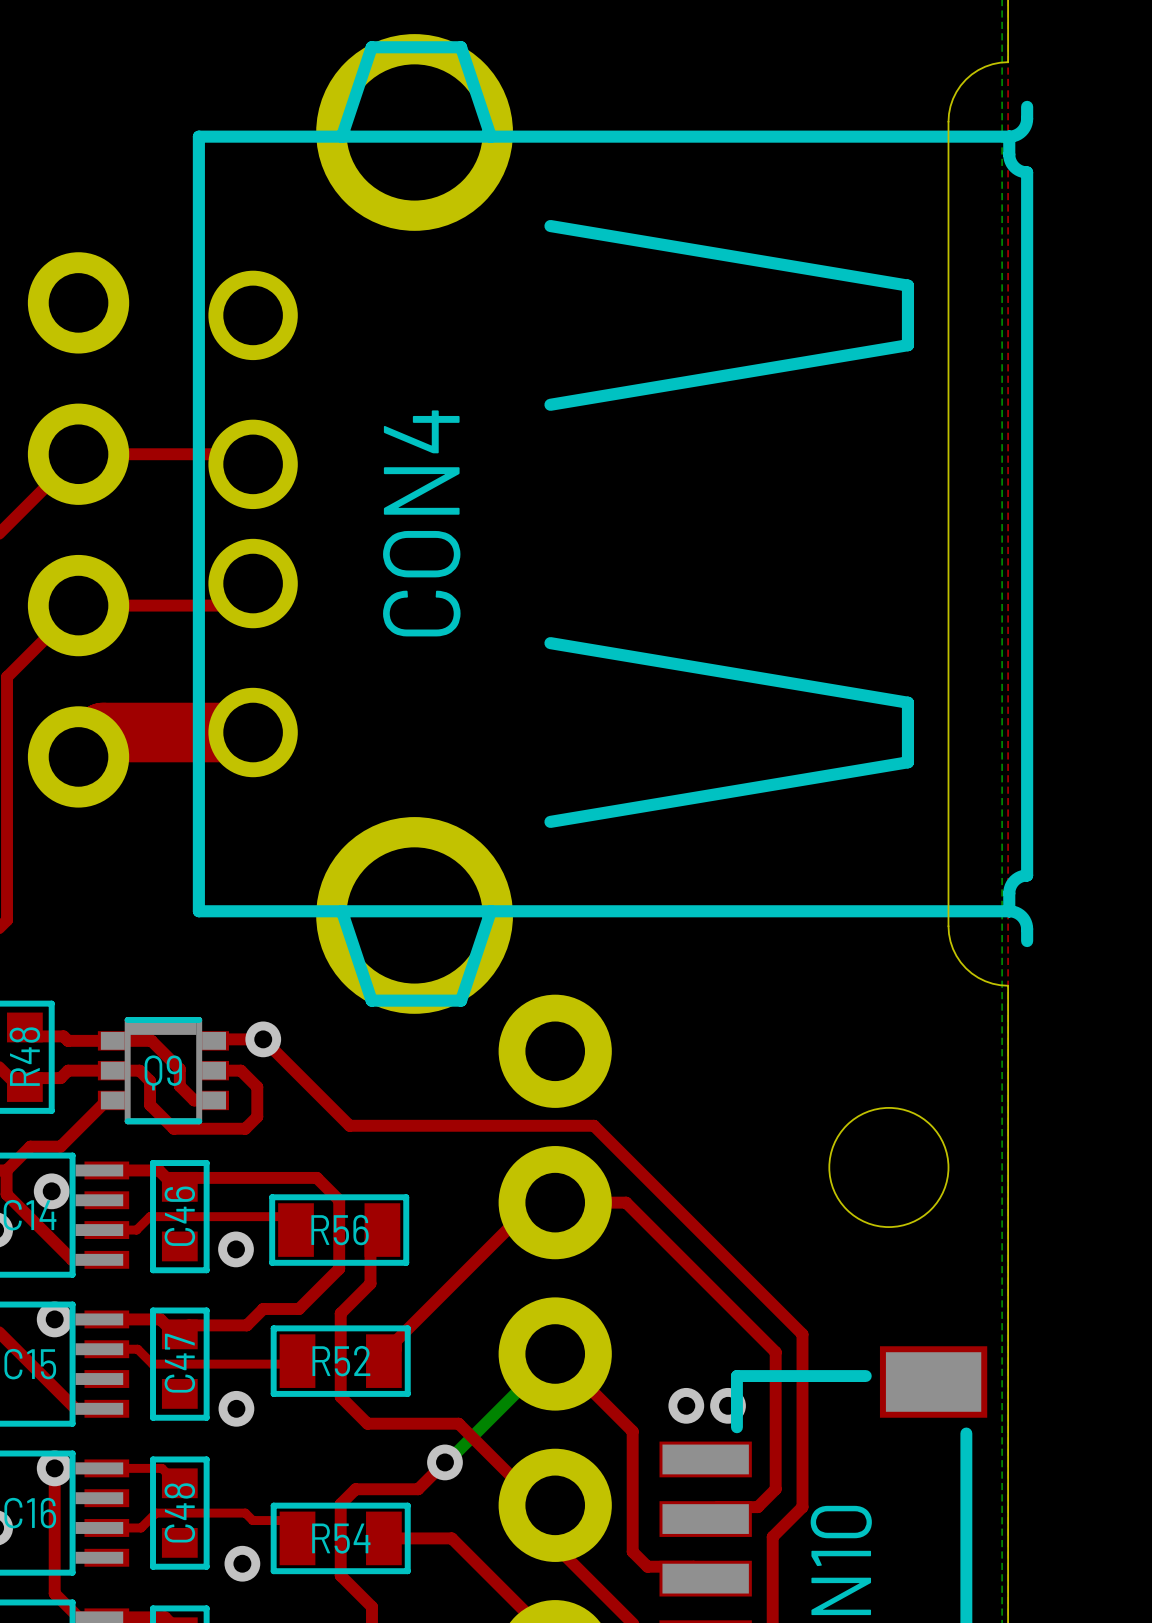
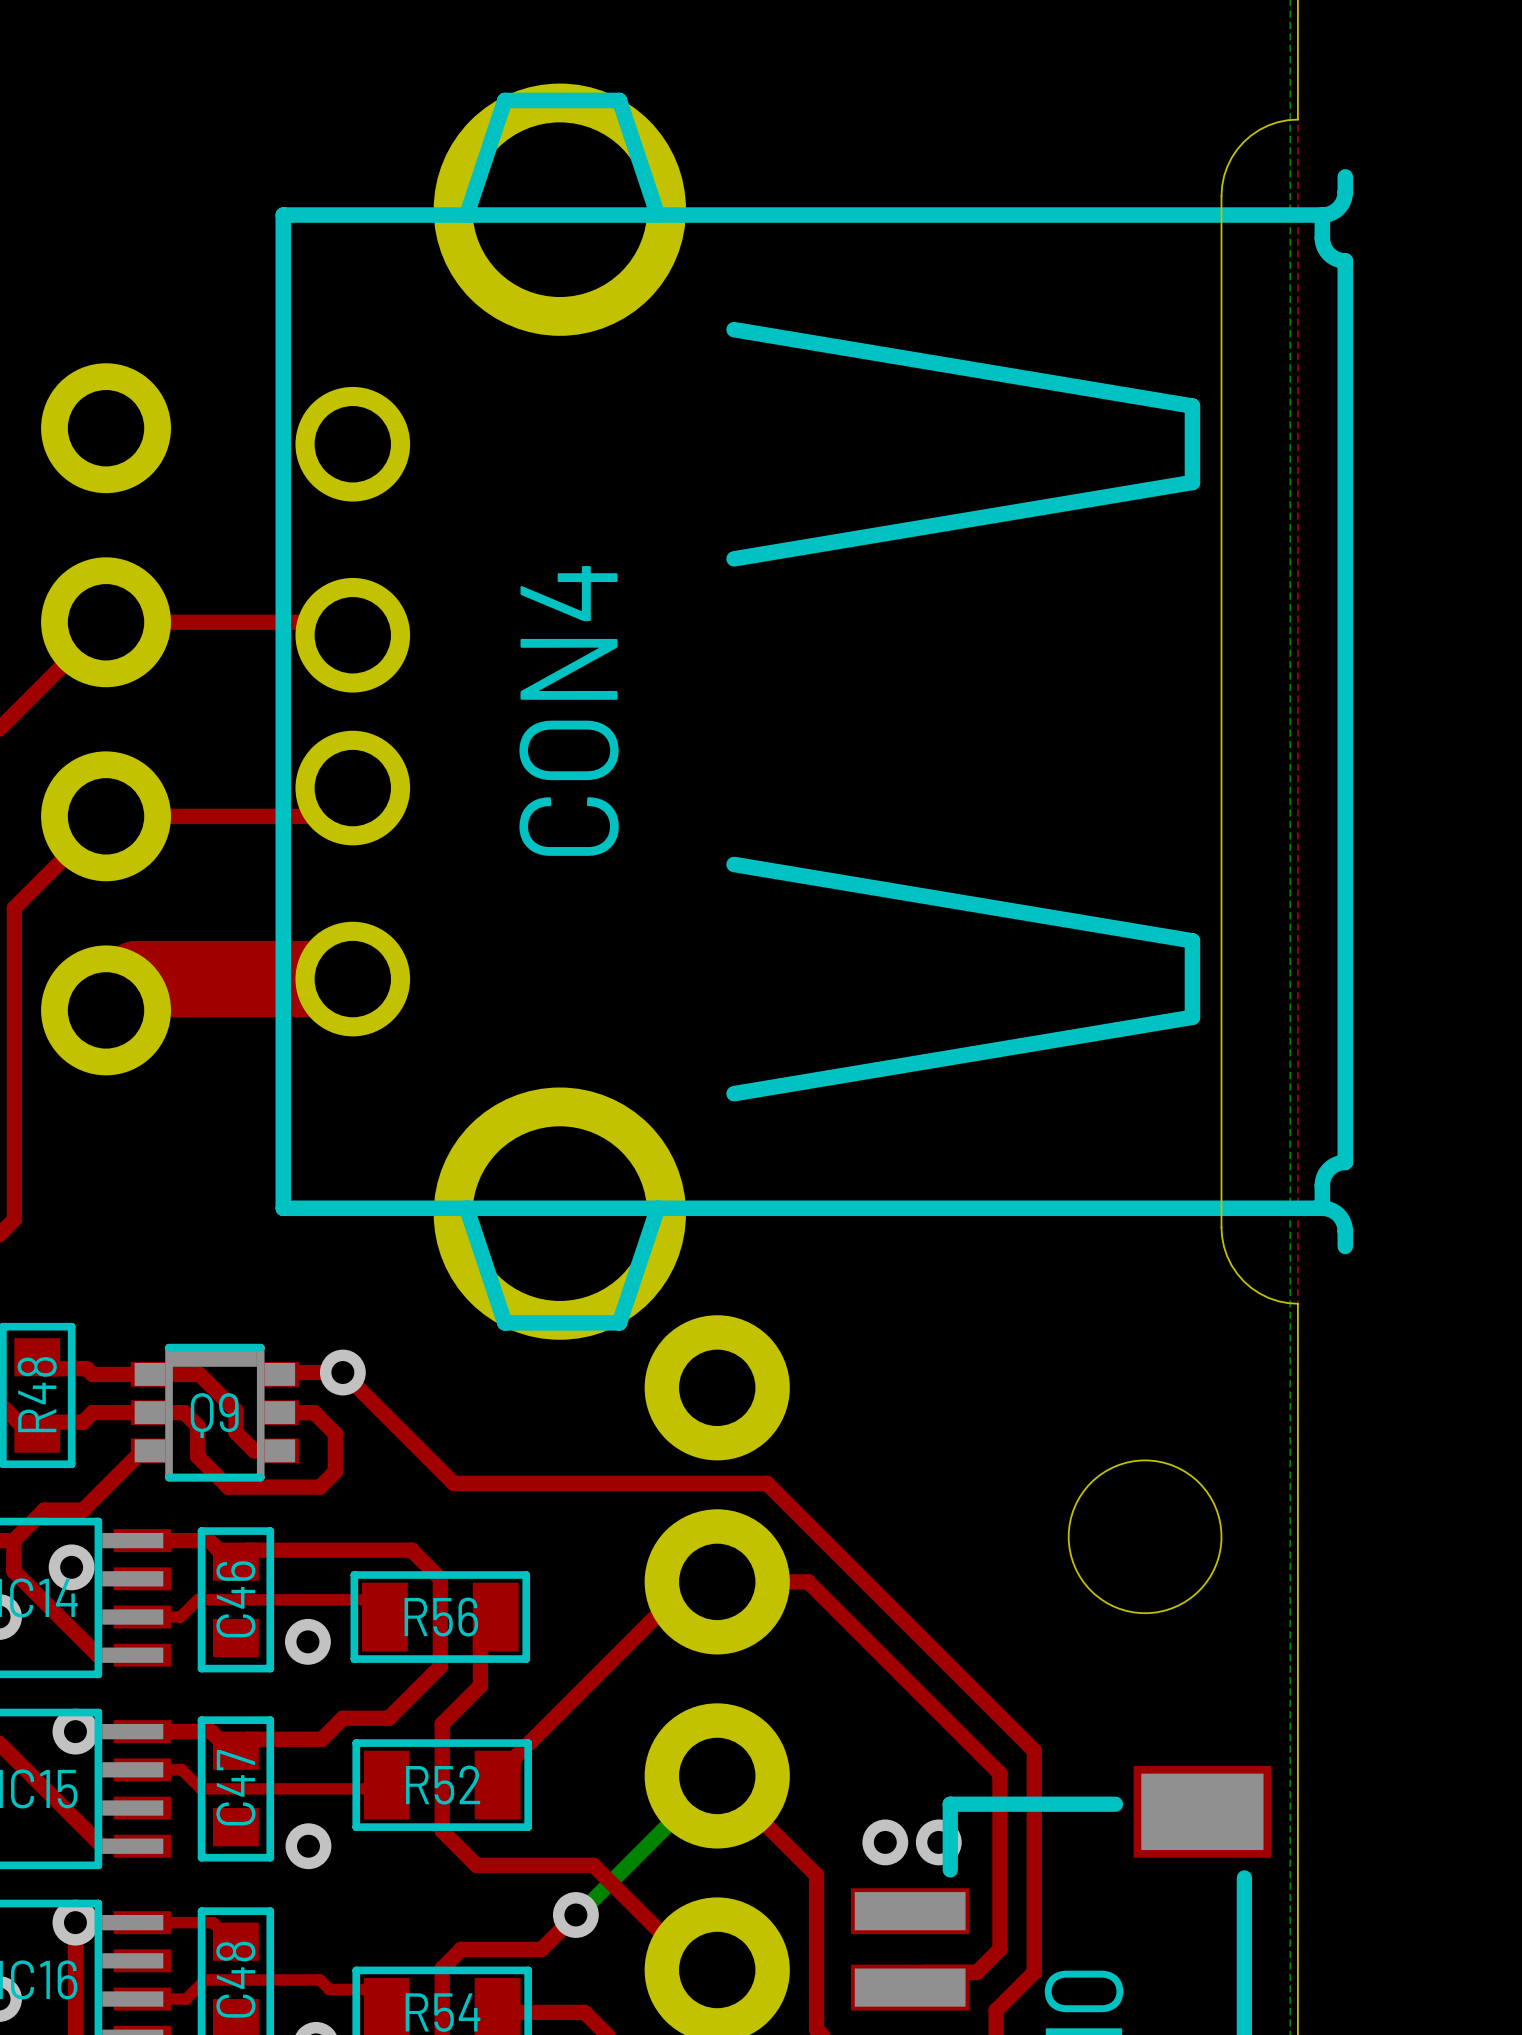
CON4 position: (613, 523) -> (814, 711)

